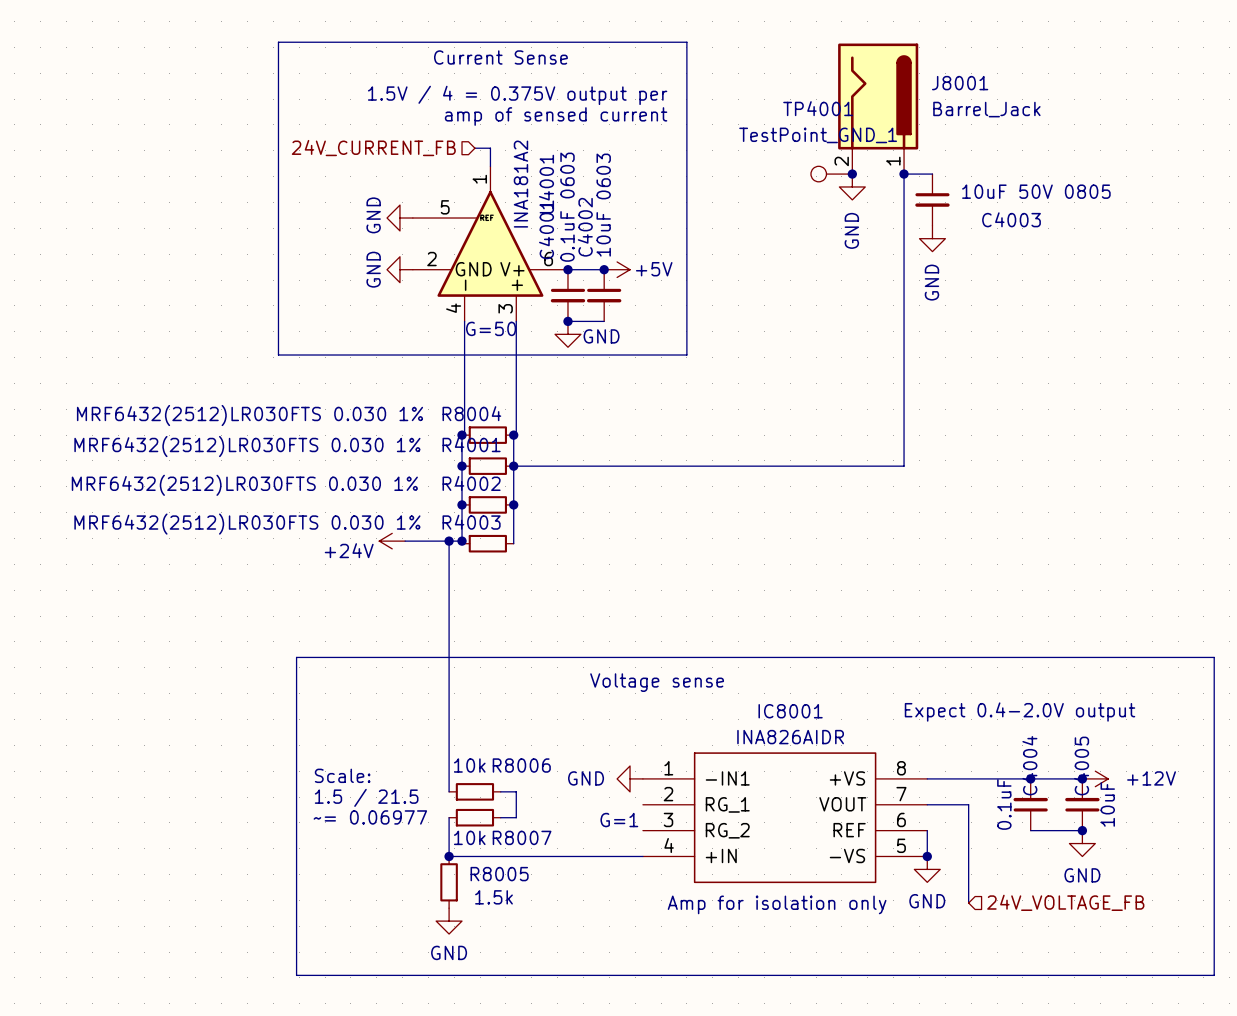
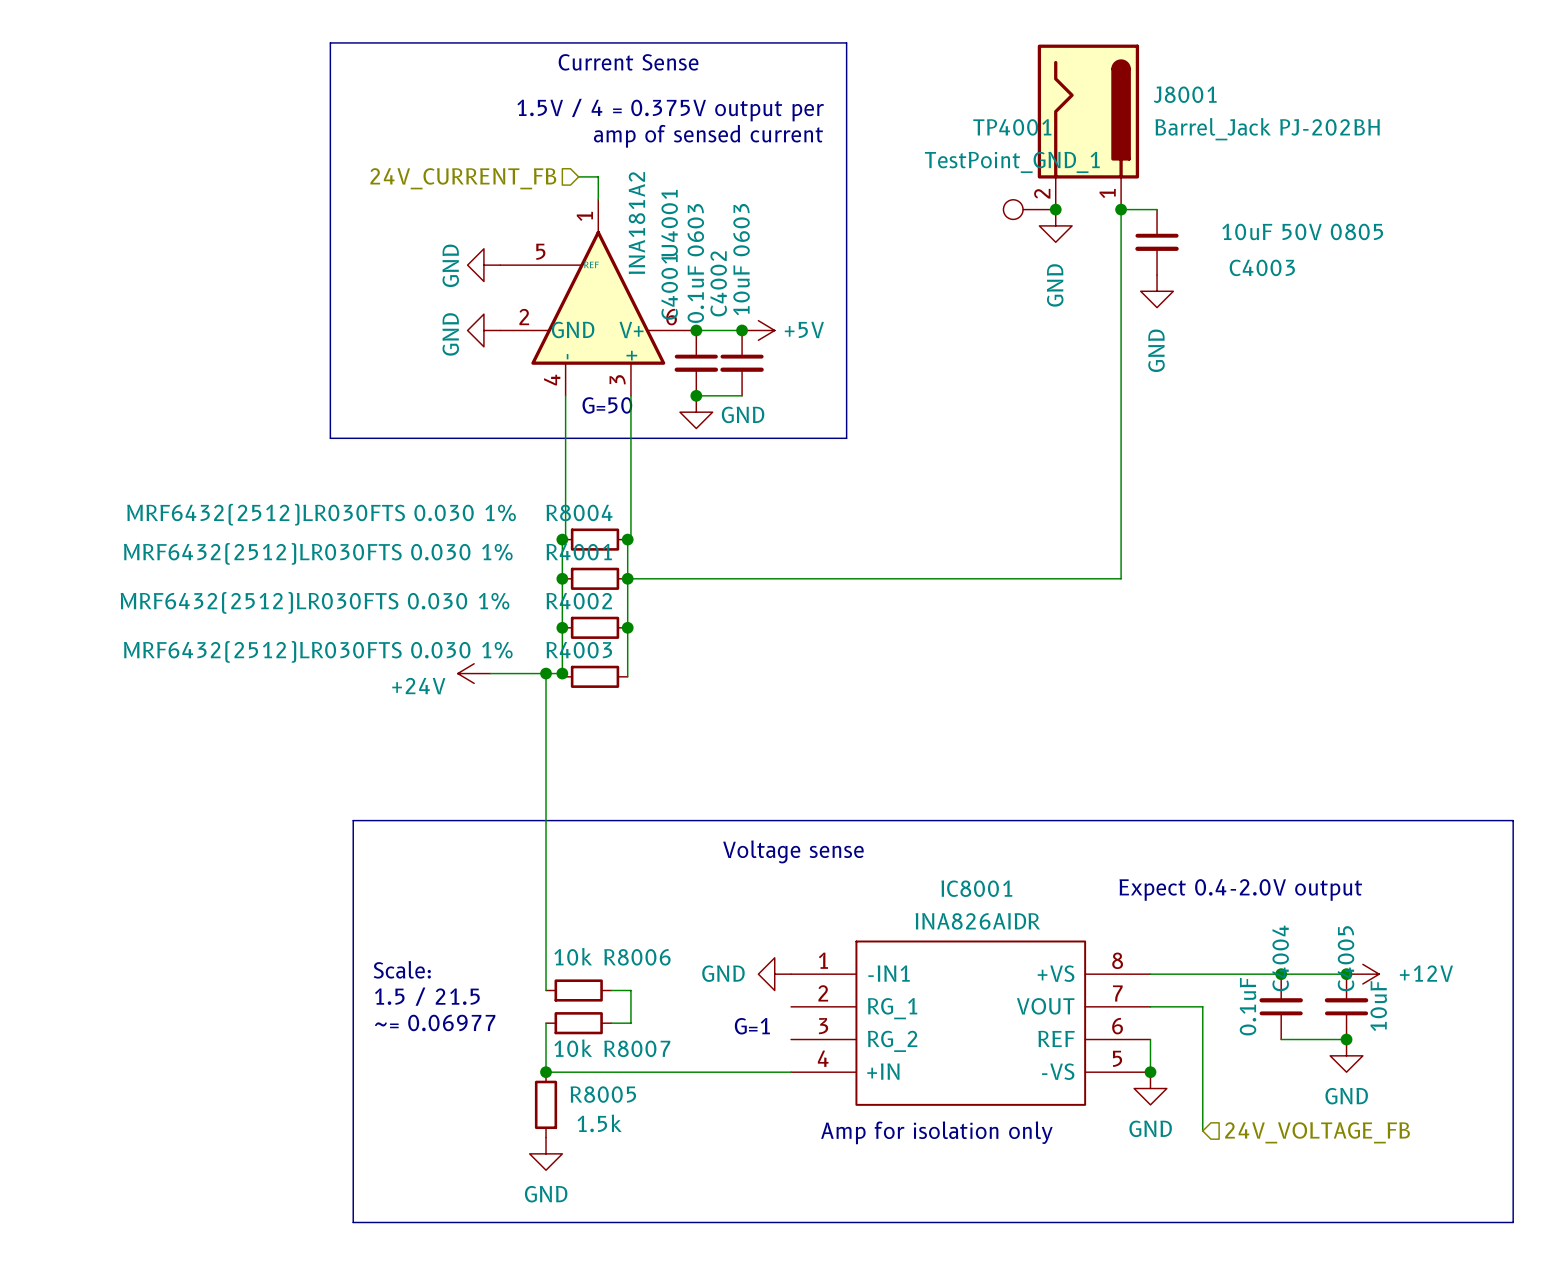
J8001 value: Barrel_Jack (986, 109) -> Barrel_Jack PJ-202BH (1267, 129)

